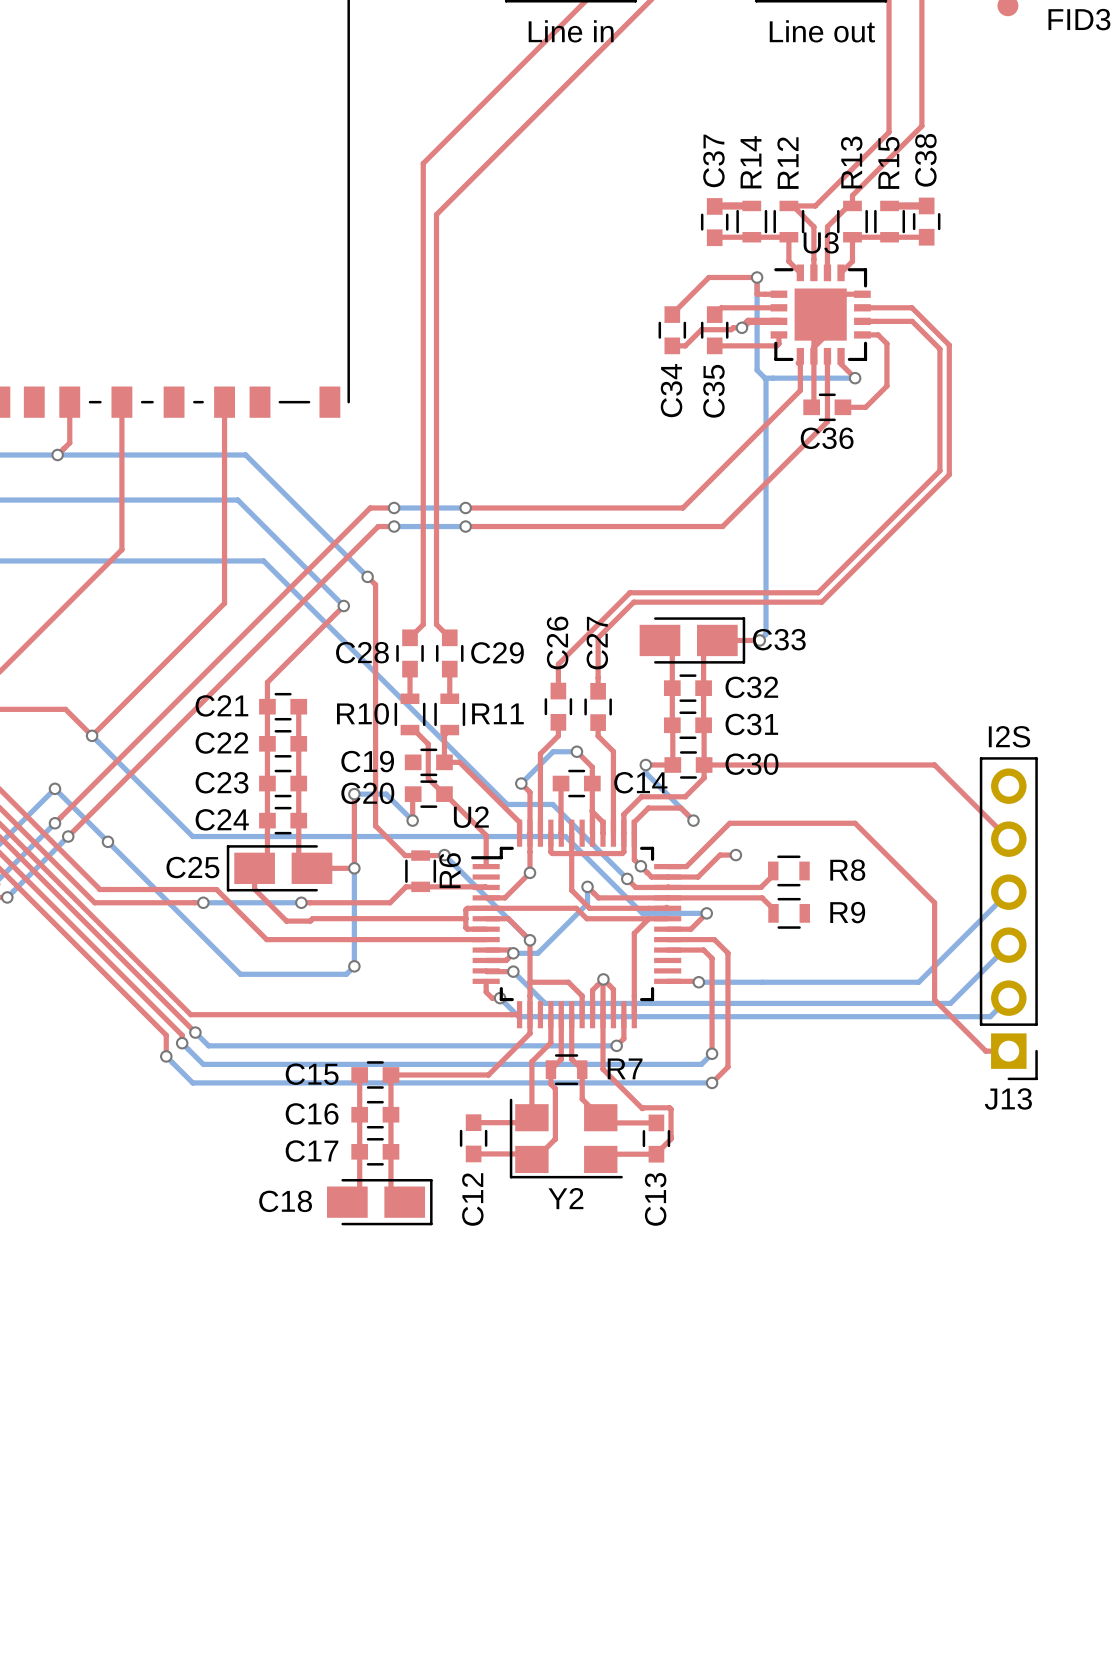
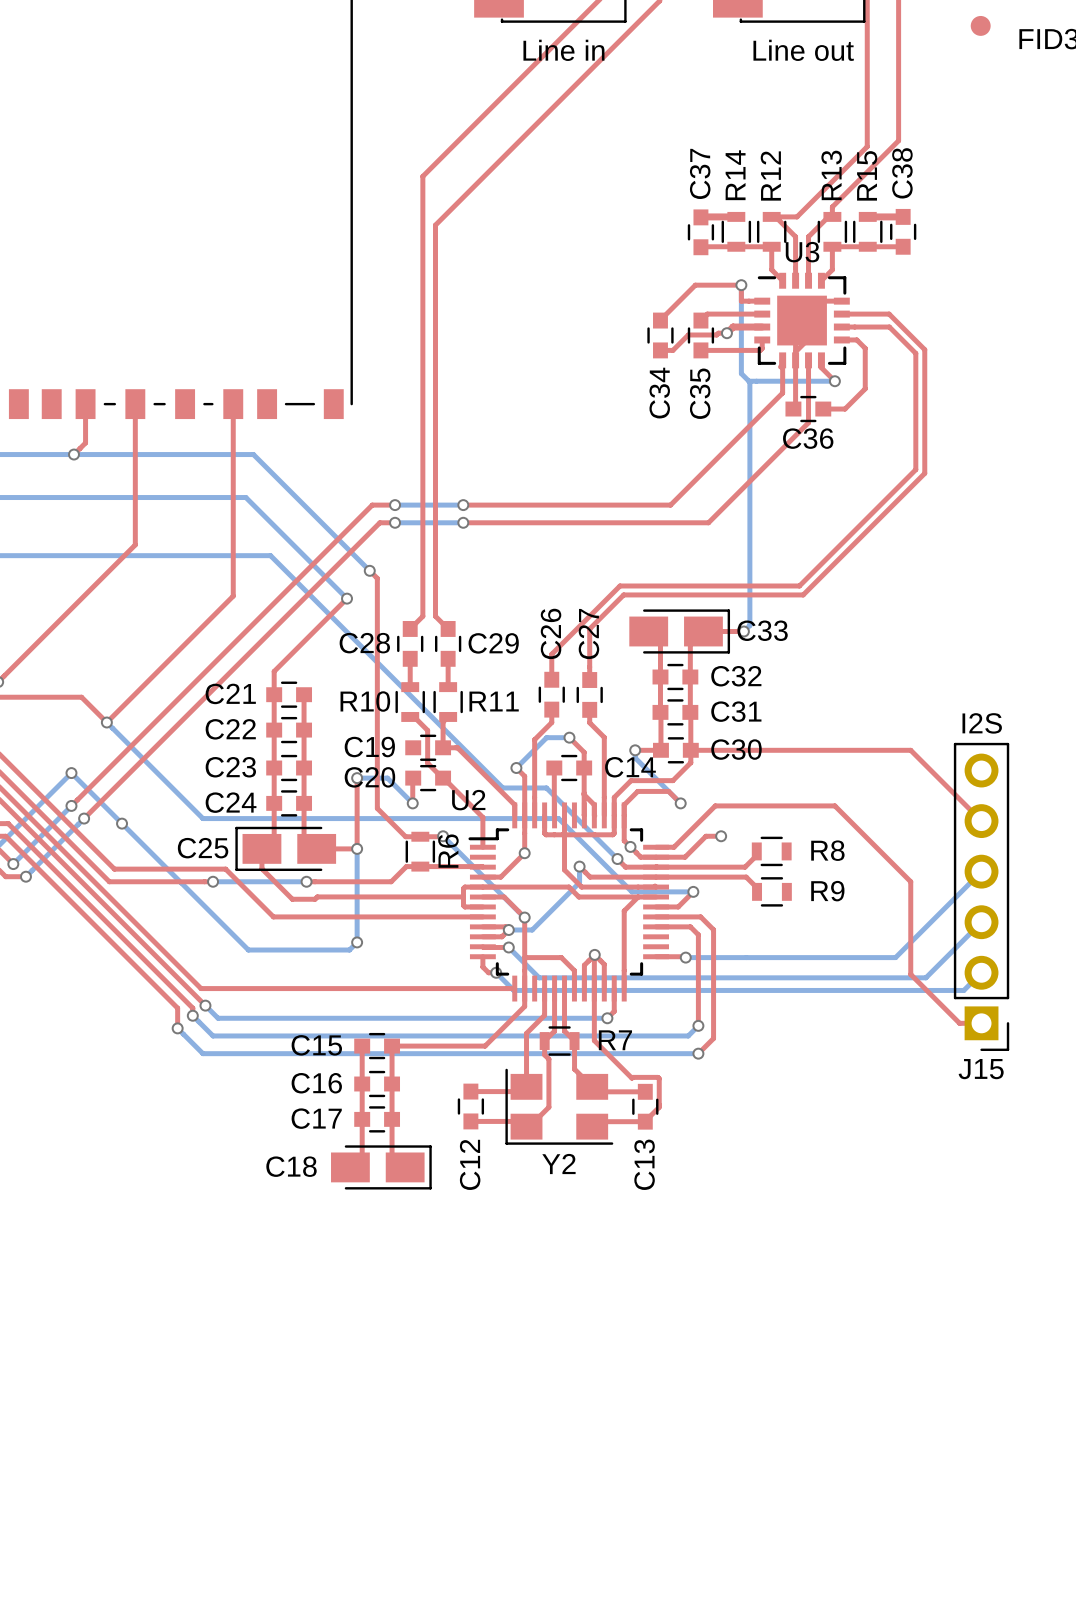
J13 name: J13 (1008, 1098) -> J15 (981, 1069)

